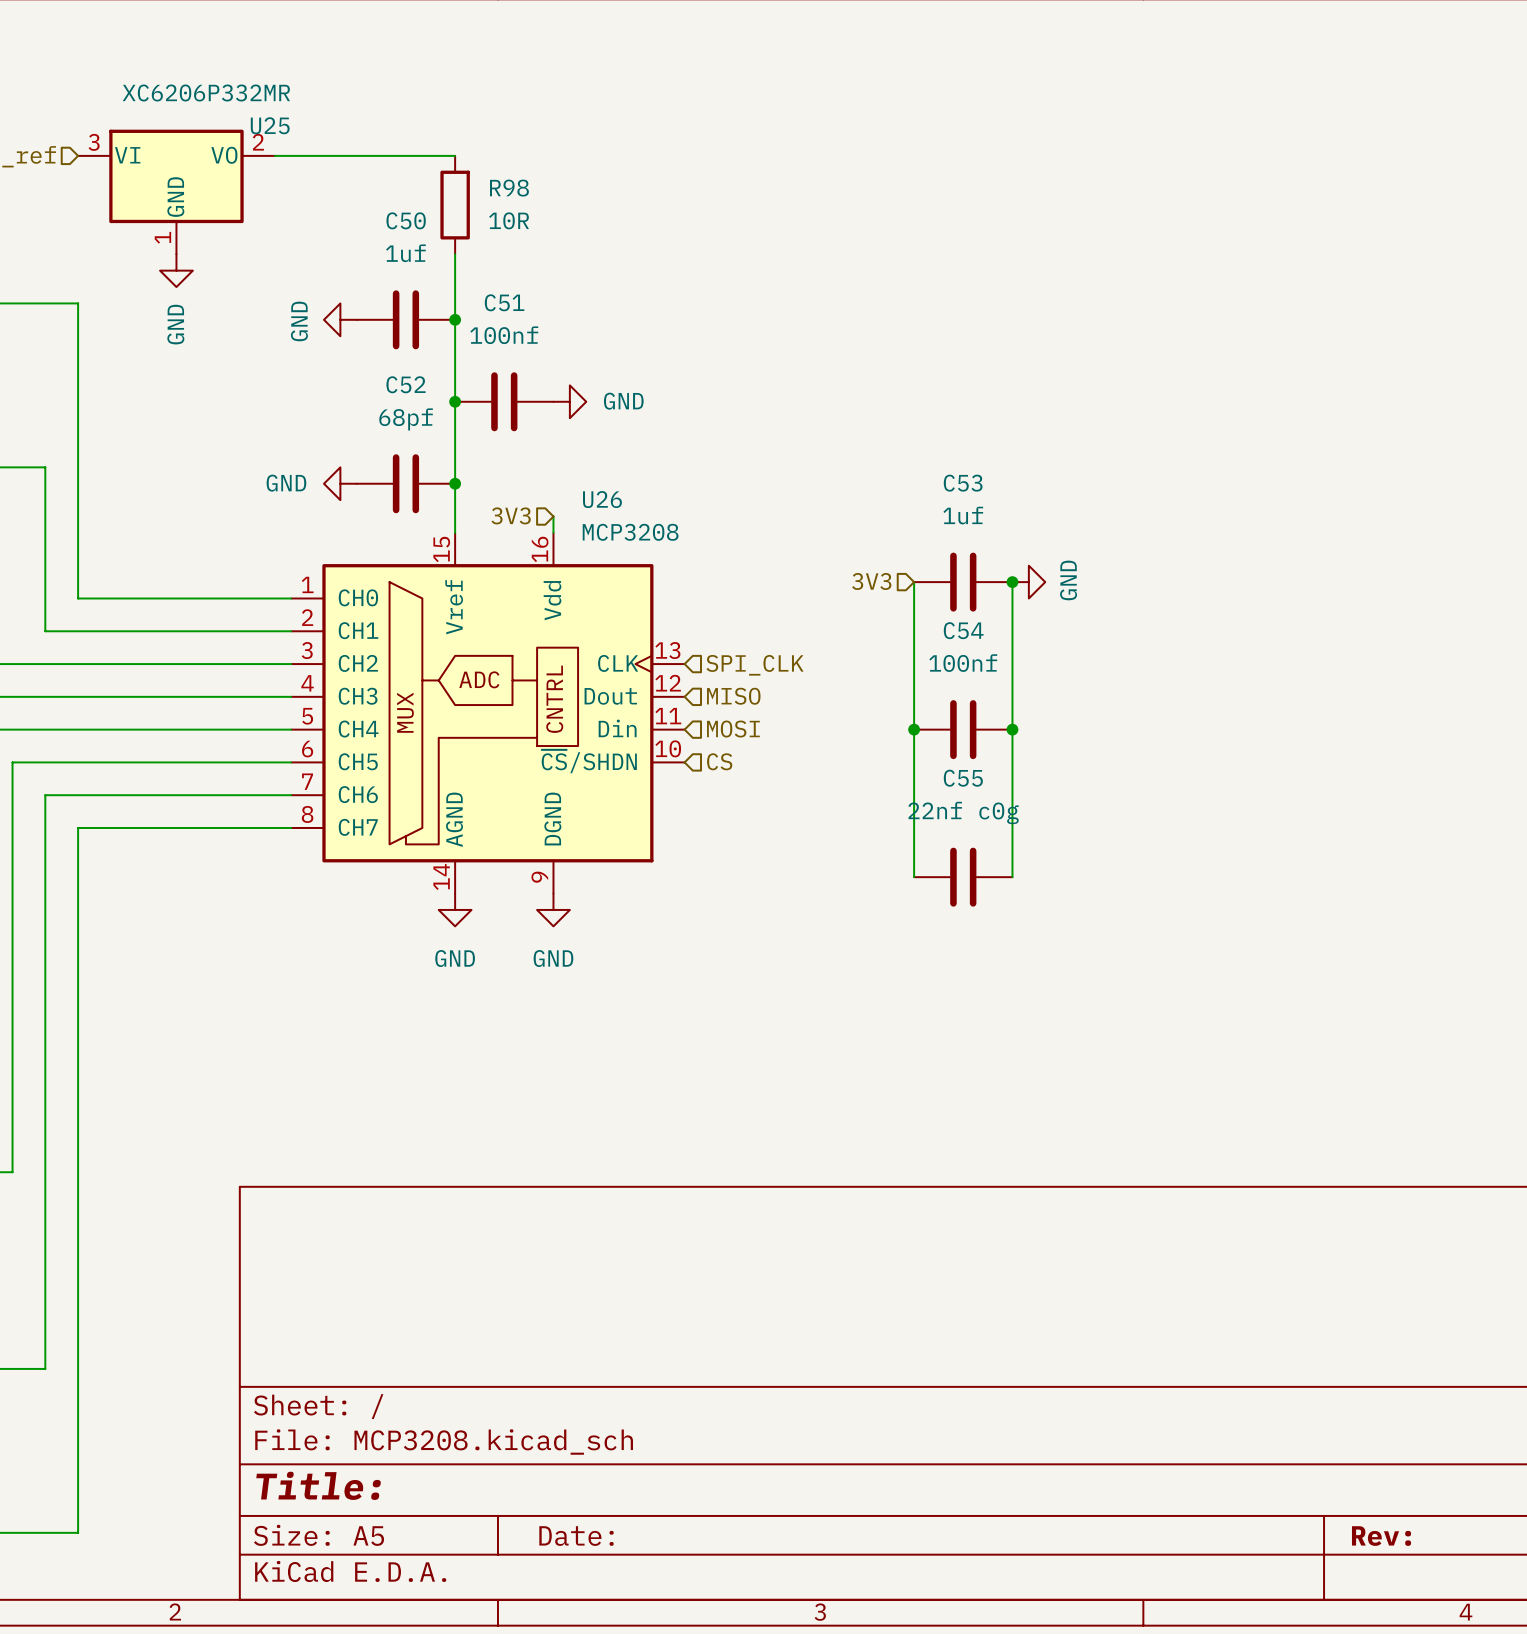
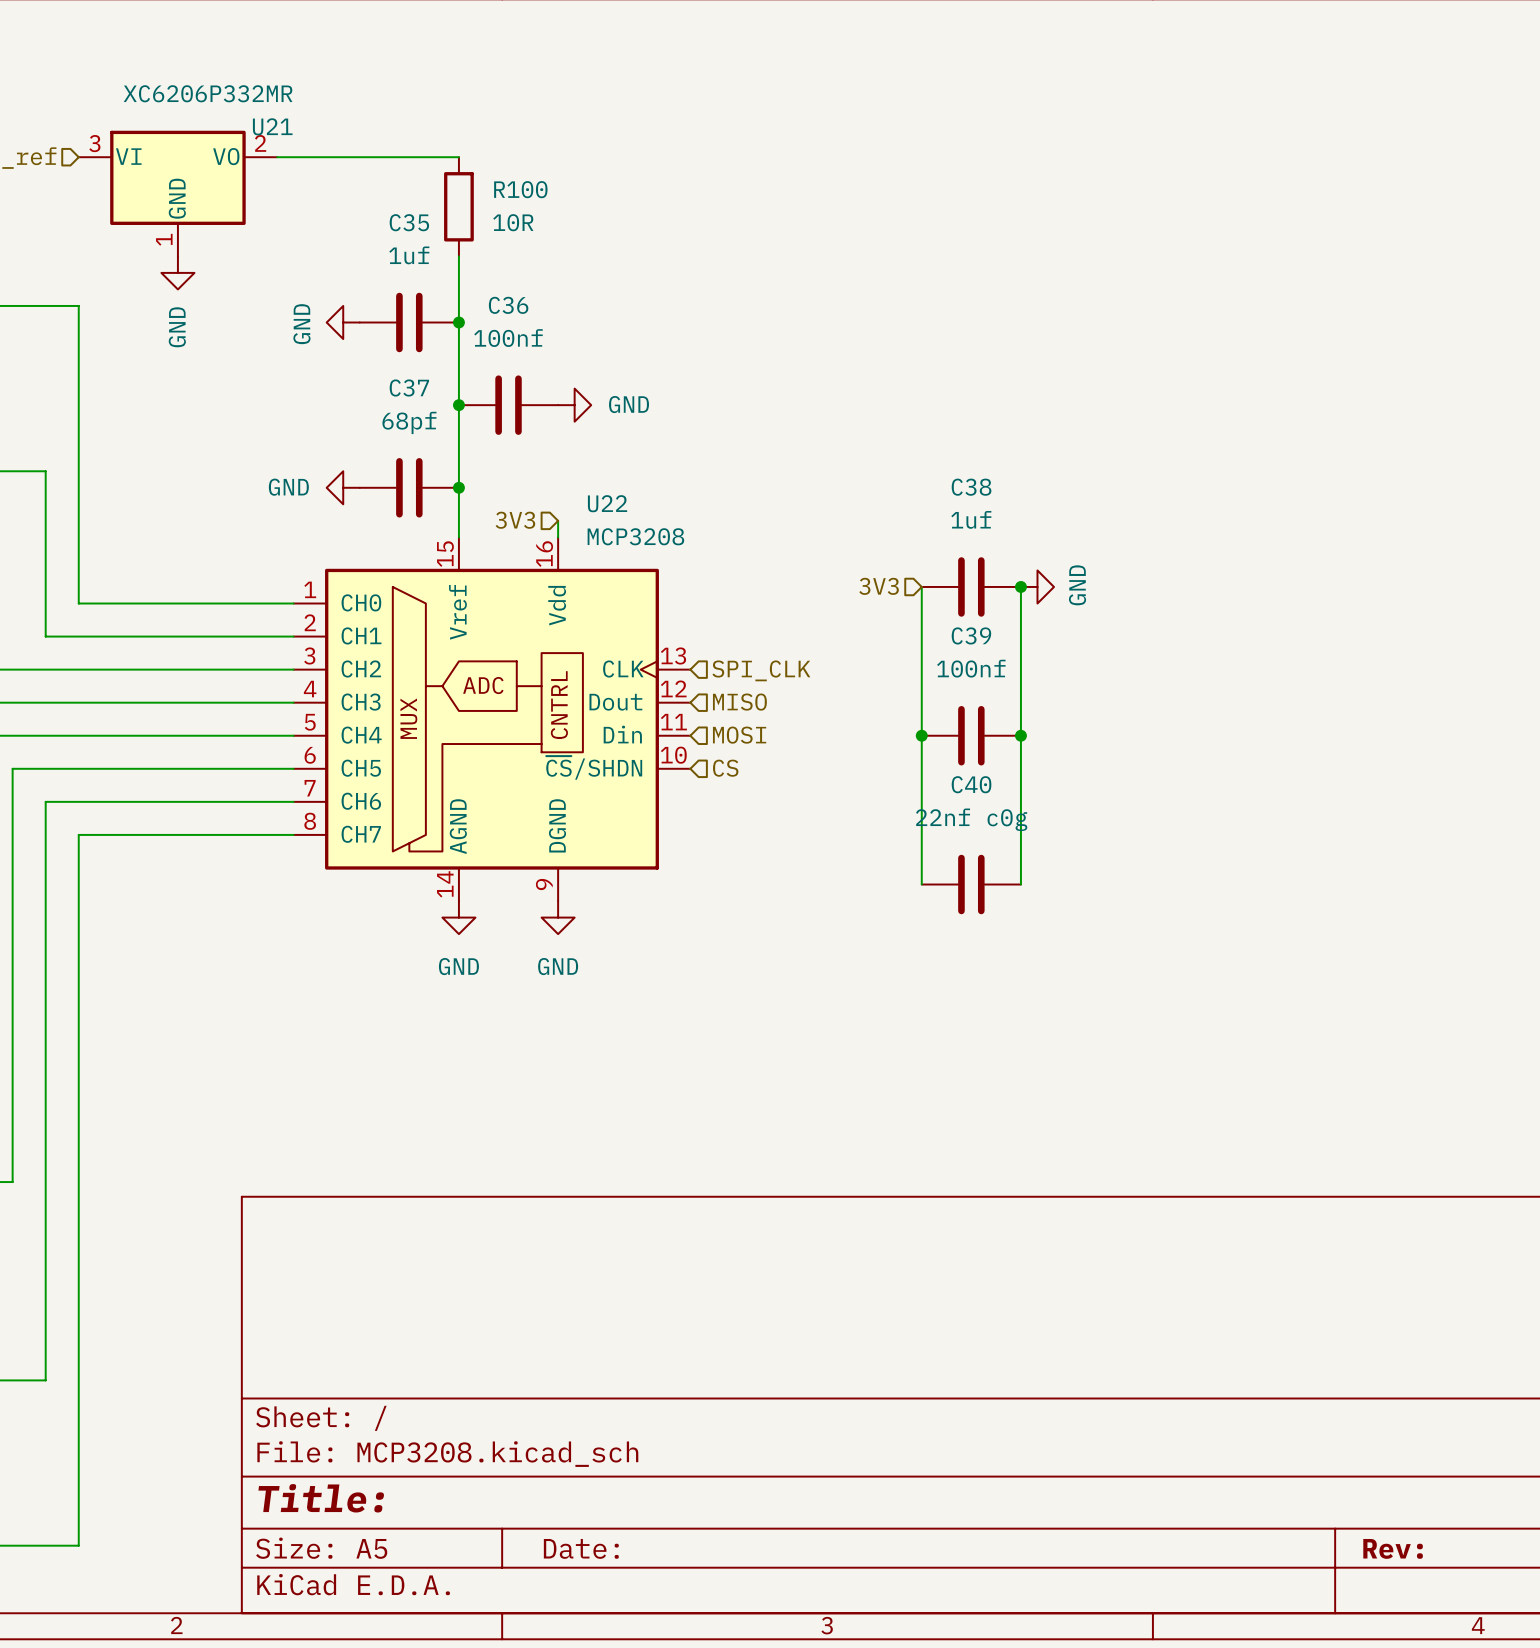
U25 name: U25 (270, 125) -> U21 (272, 126)
R98 name: R98 (509, 188) -> R100 (520, 189)
C50 name: C50 (406, 220) -> C35 (409, 222)
C51 name: C51 (504, 302) -> C36 (508, 305)
C52 name: C52 (406, 384) -> C37 (409, 388)
C53 name: C53 (963, 483) -> C38 (971, 487)
U26 name: U26 (602, 499) -> U22 (607, 503)
C54 name: C54 (963, 630) -> C39 (971, 635)
C55 name: C55 (963, 778) -> C40 (971, 784)

